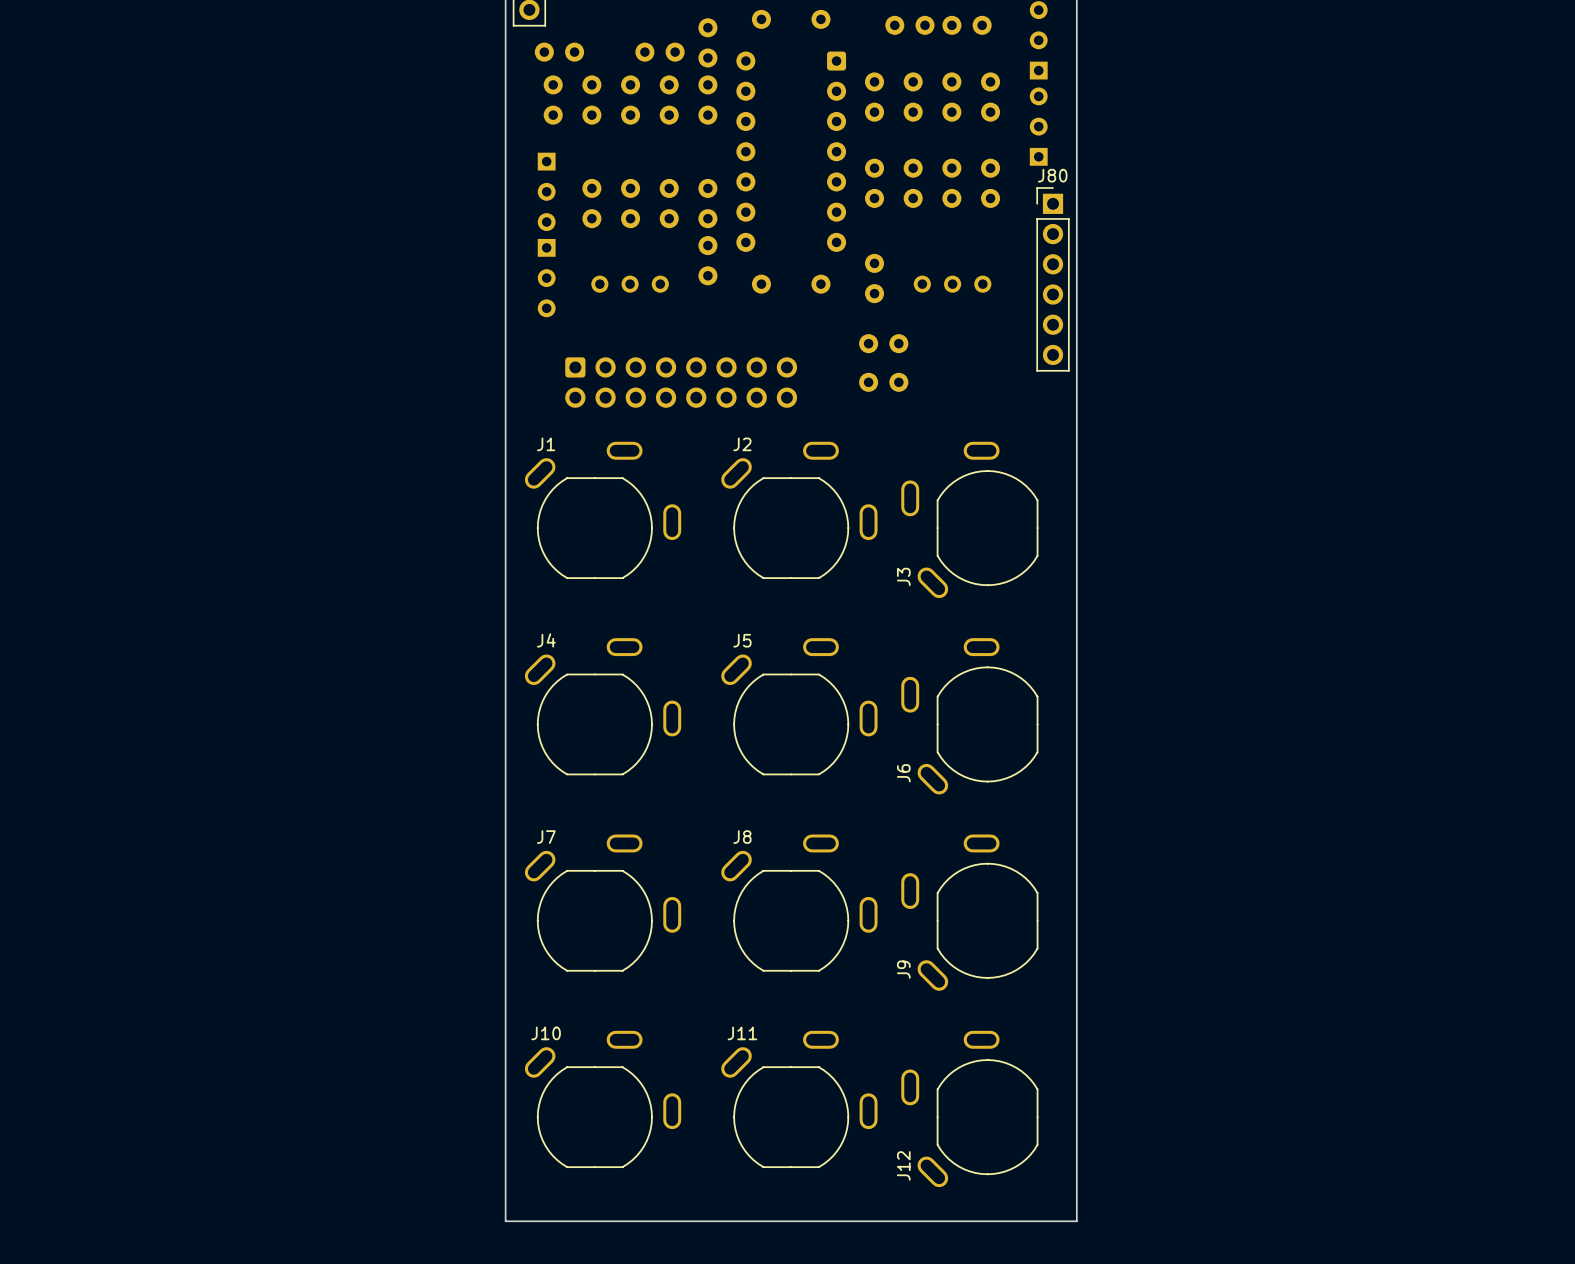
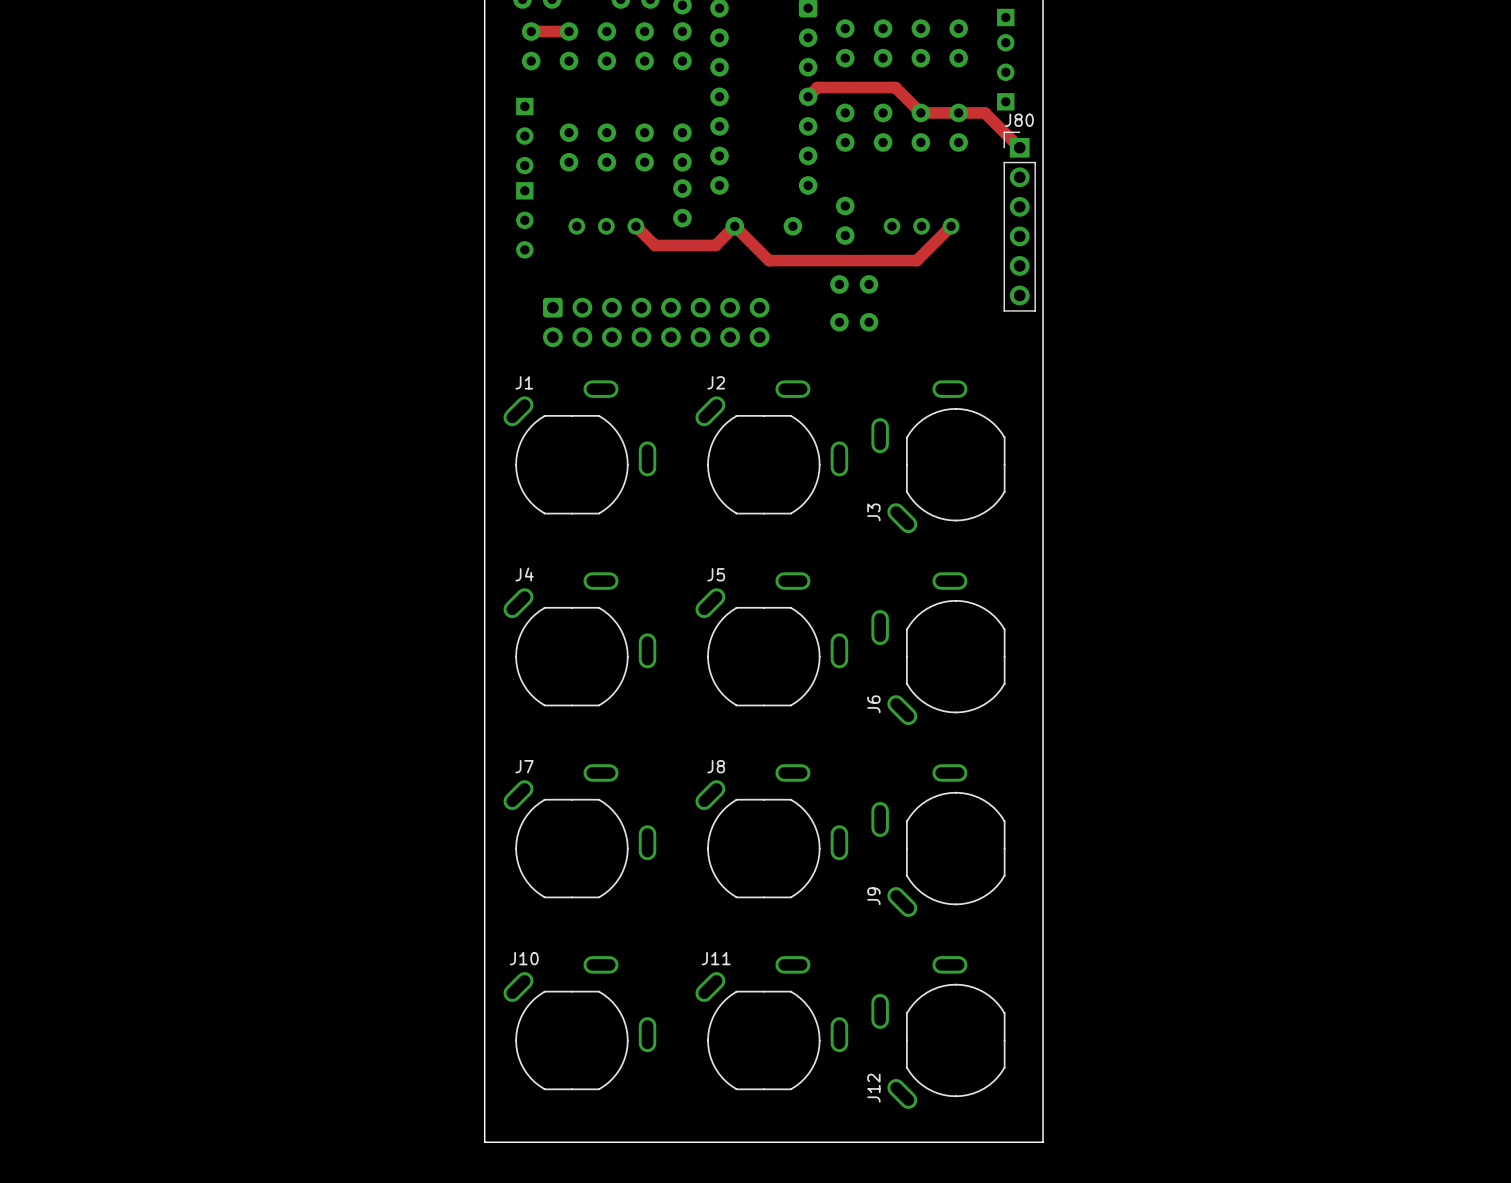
track: none -> (531, 31) (569, 31)
track: none -> (808, 96) (817, 87) (895, 87) (920, 112) (984, 112) (1019, 147)
track: none -> (635, 226) (655, 245) (715, 245) (734, 226) (769, 260) (916, 260) (951, 226)

